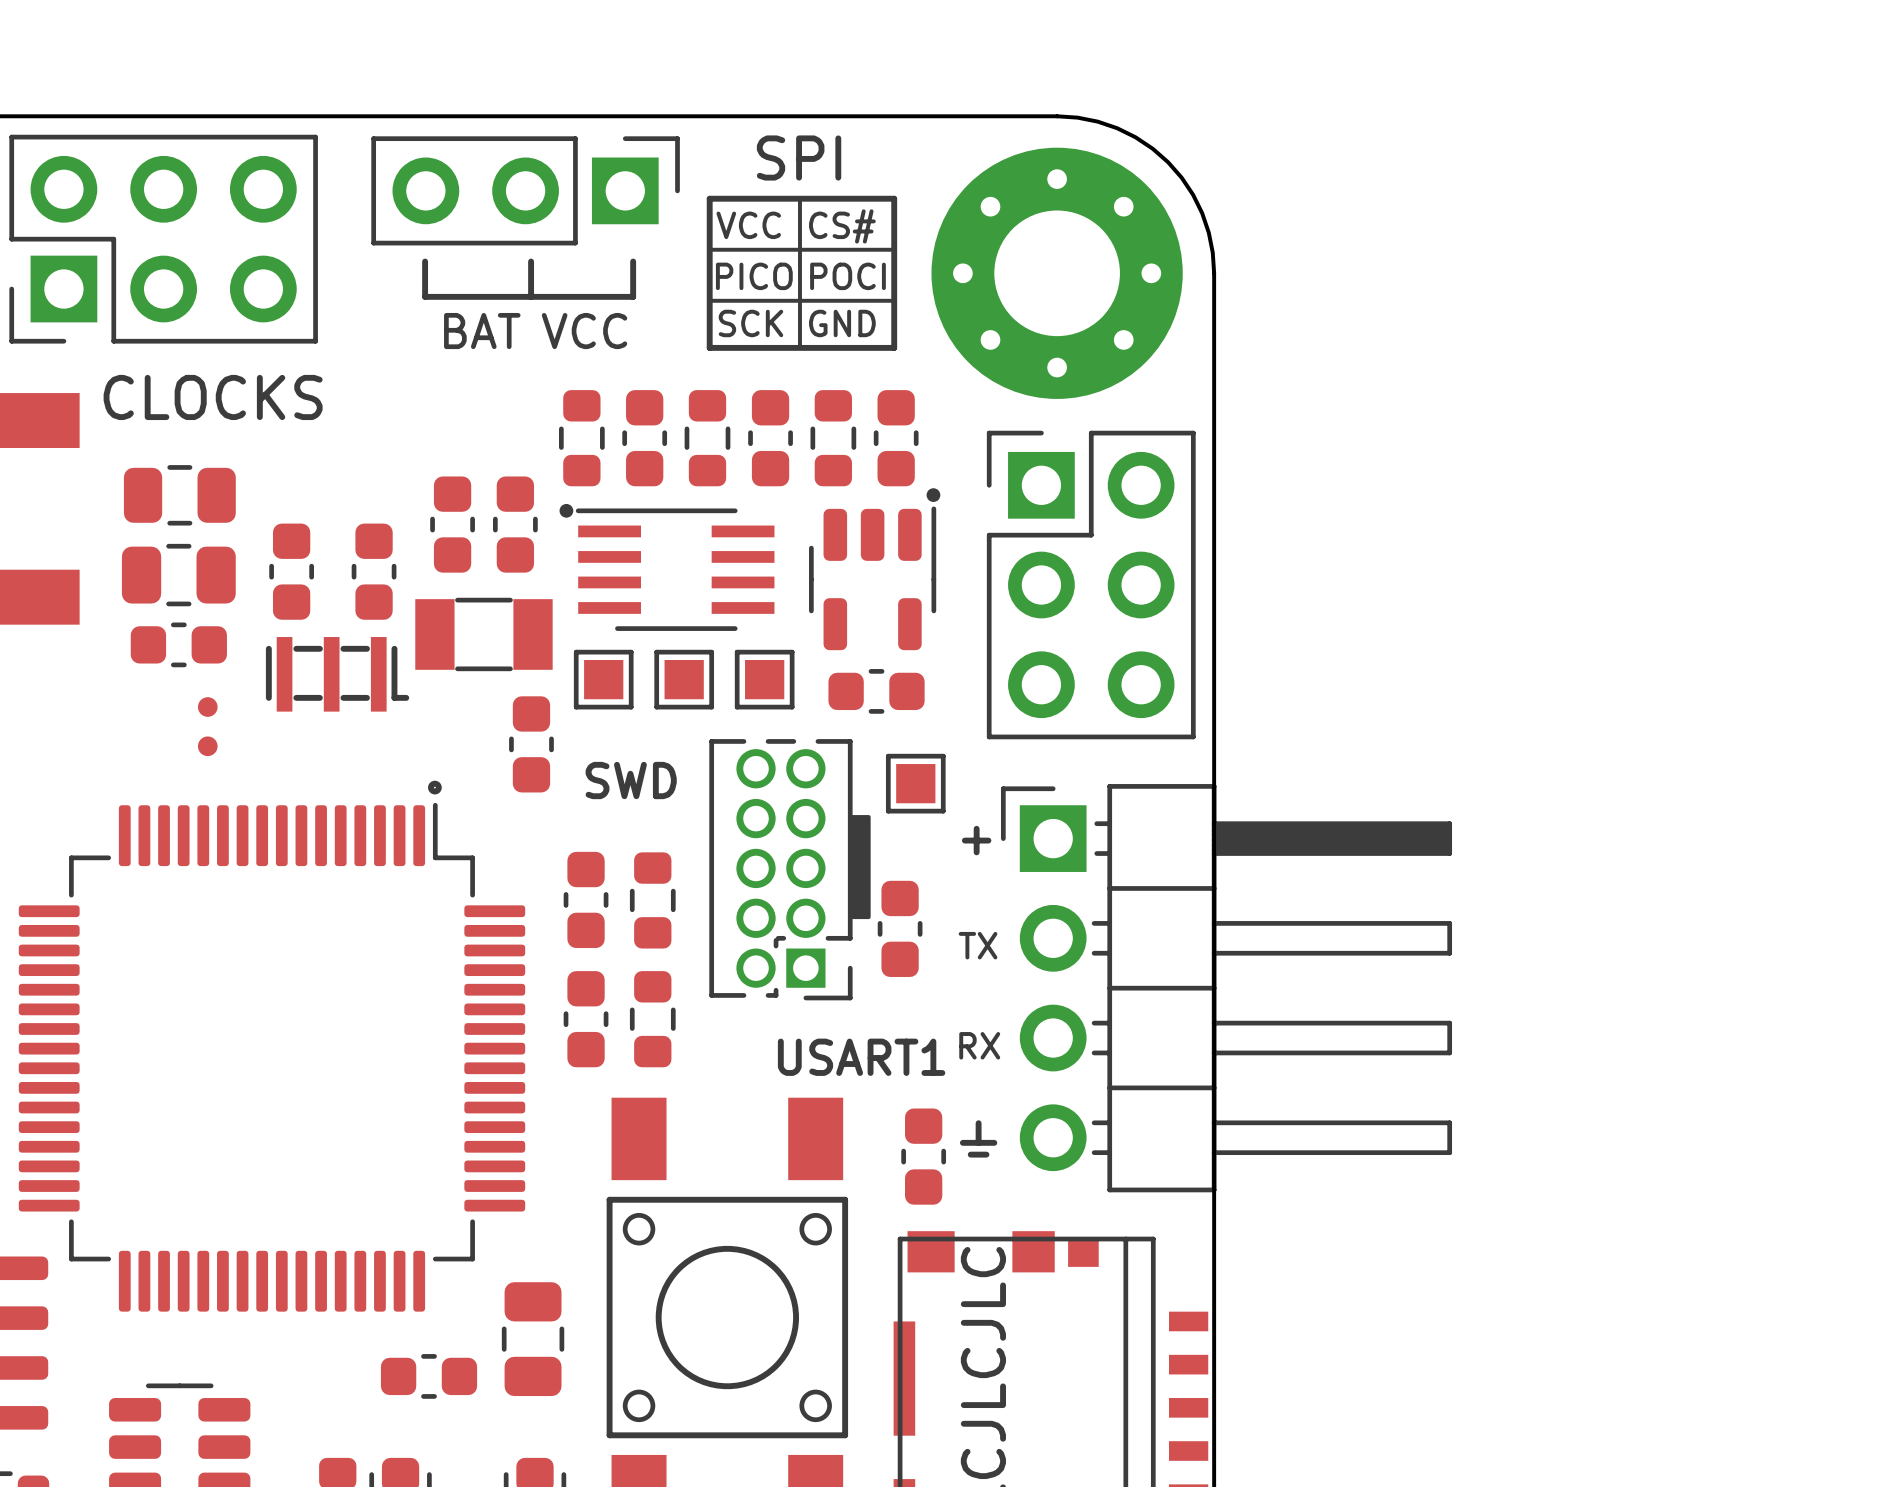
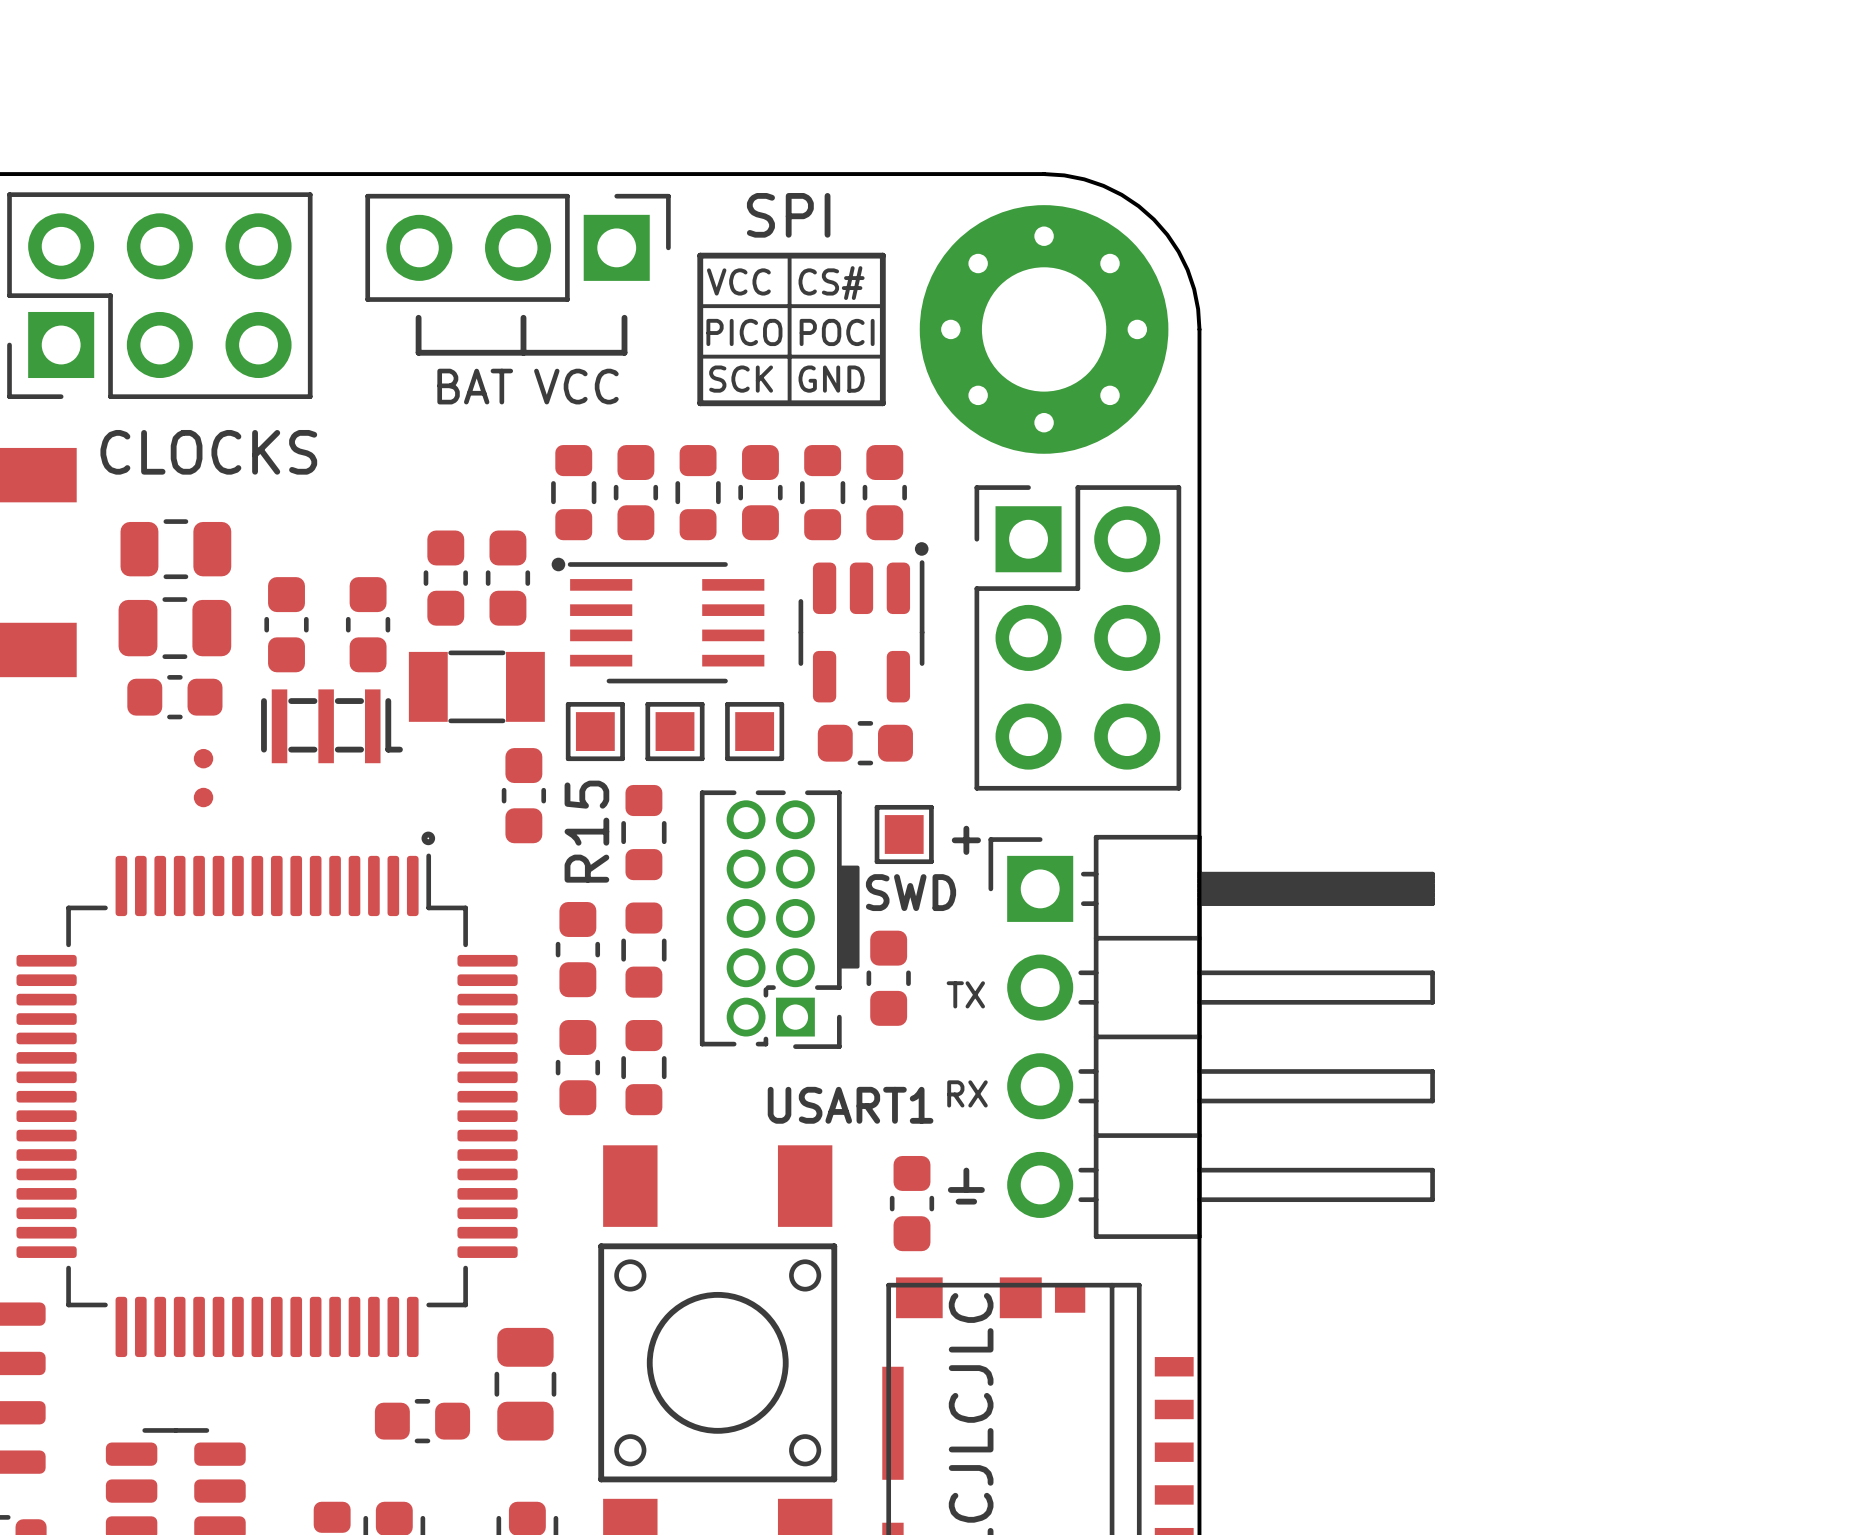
text position: SWD (631, 780) -> SWD (911, 892)
R15: none -> (643, 832)
line: (976, 828) (976, 852) -> (966, 828) (966, 851)
line: (964, 840) (988, 840) -> (954, 840) (978, 840)

